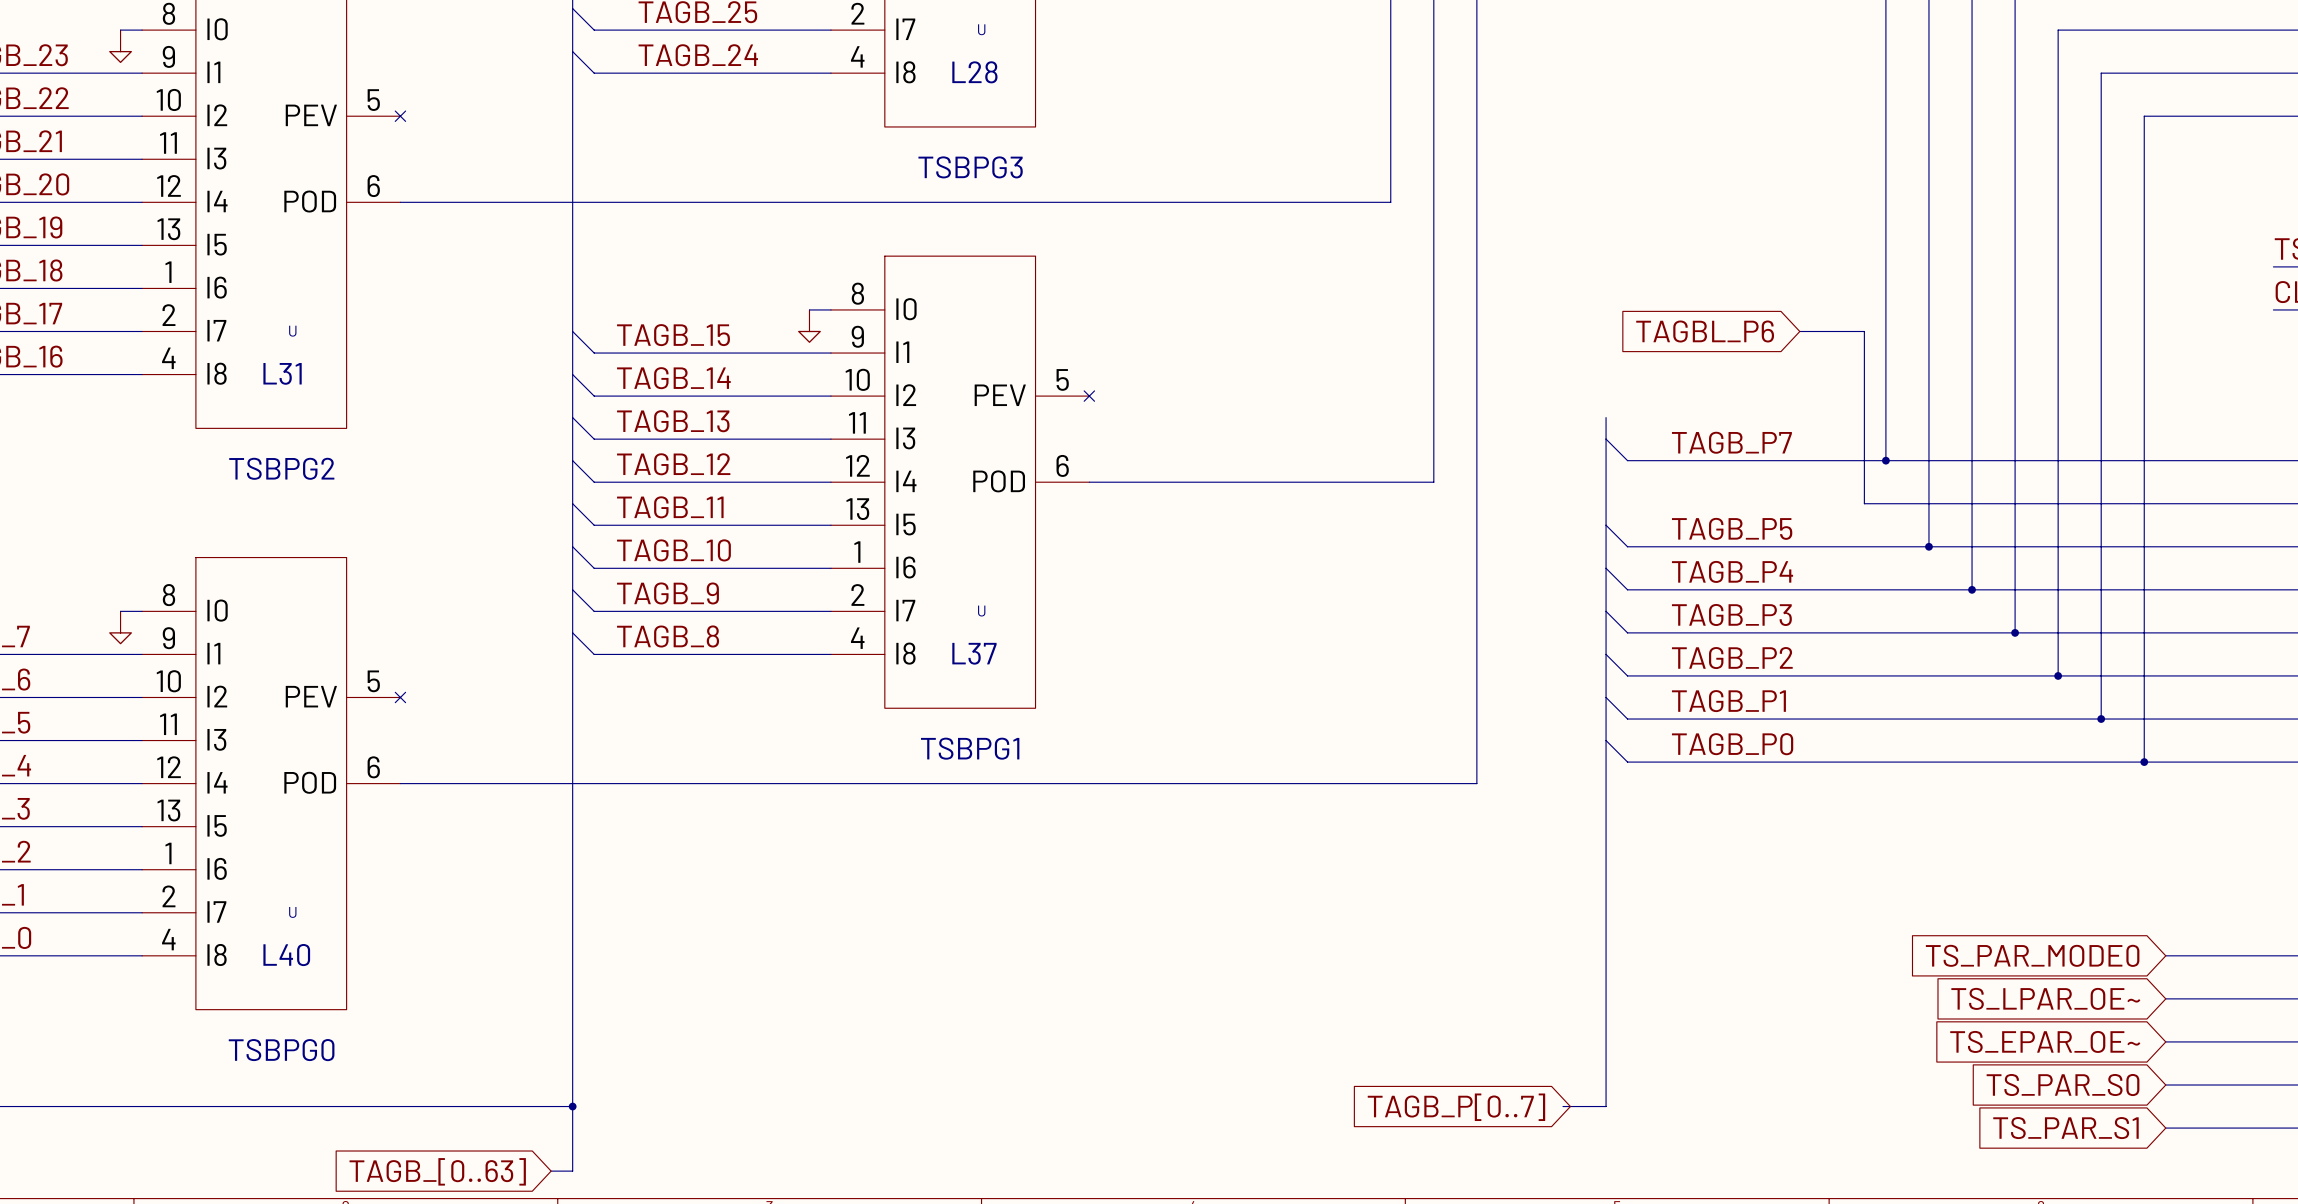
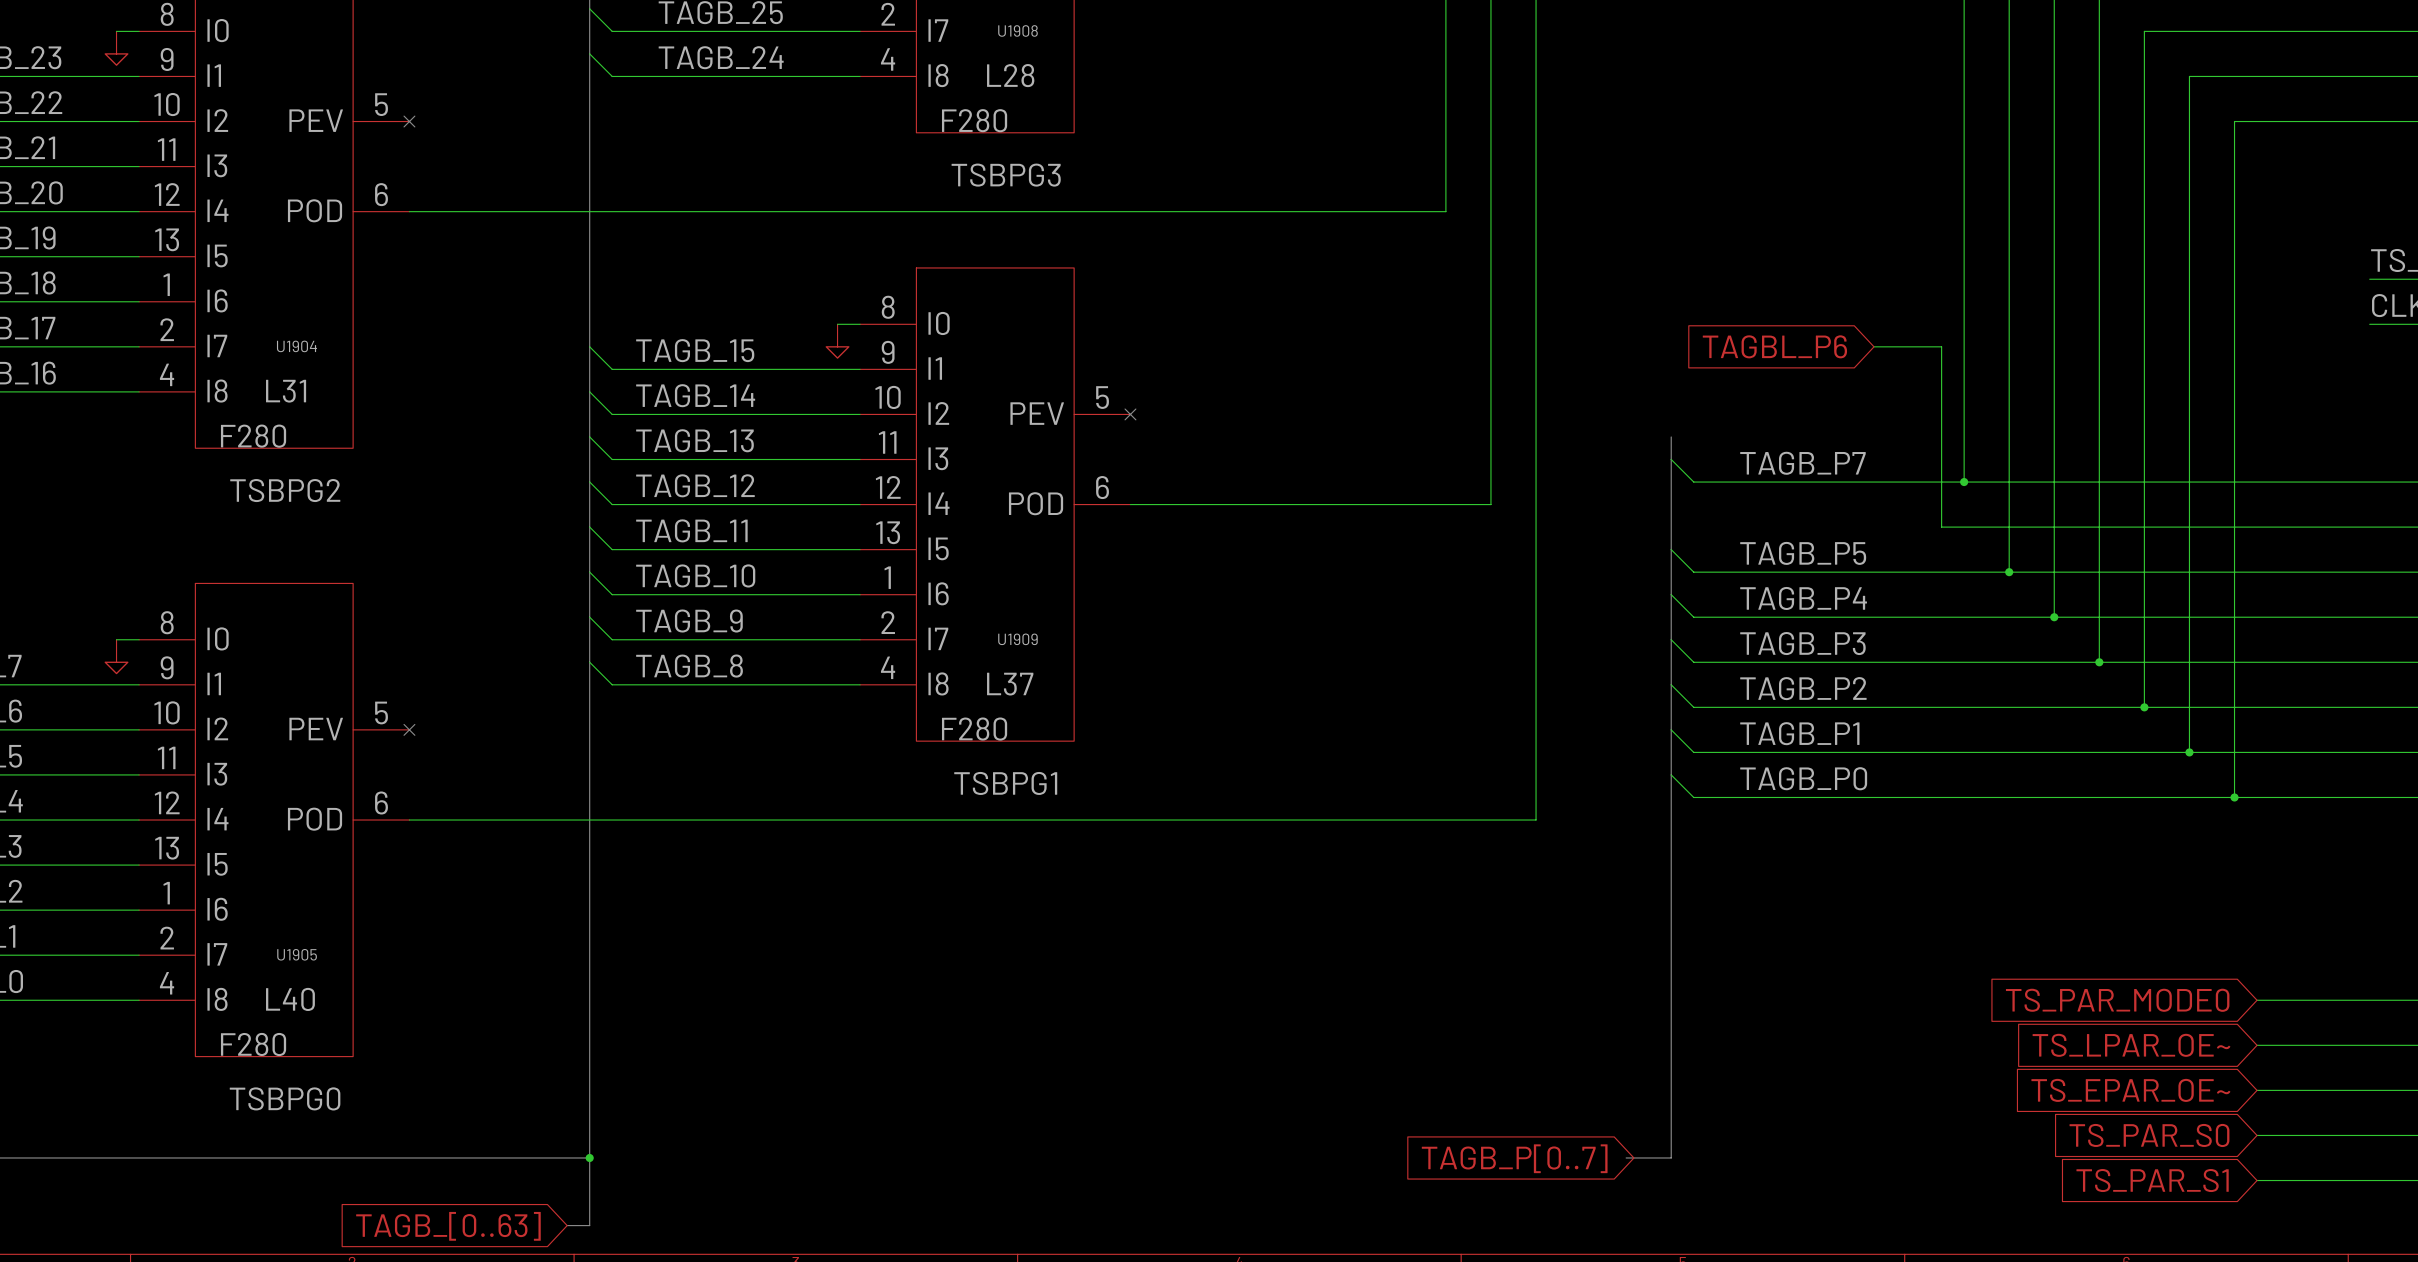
U name: U (981, 29) -> U1908 (1018, 30)
U value: none -> F280 (974, 120)
U name: U (292, 331) -> U1904 (296, 346)
U value: none -> F280 (253, 436)
U name: U (981, 611) -> U1909 (1017, 639)
U value: none -> F280 (974, 729)
U name: U (292, 912) -> U1905 (297, 954)
U value: none -> F280 (253, 1044)

